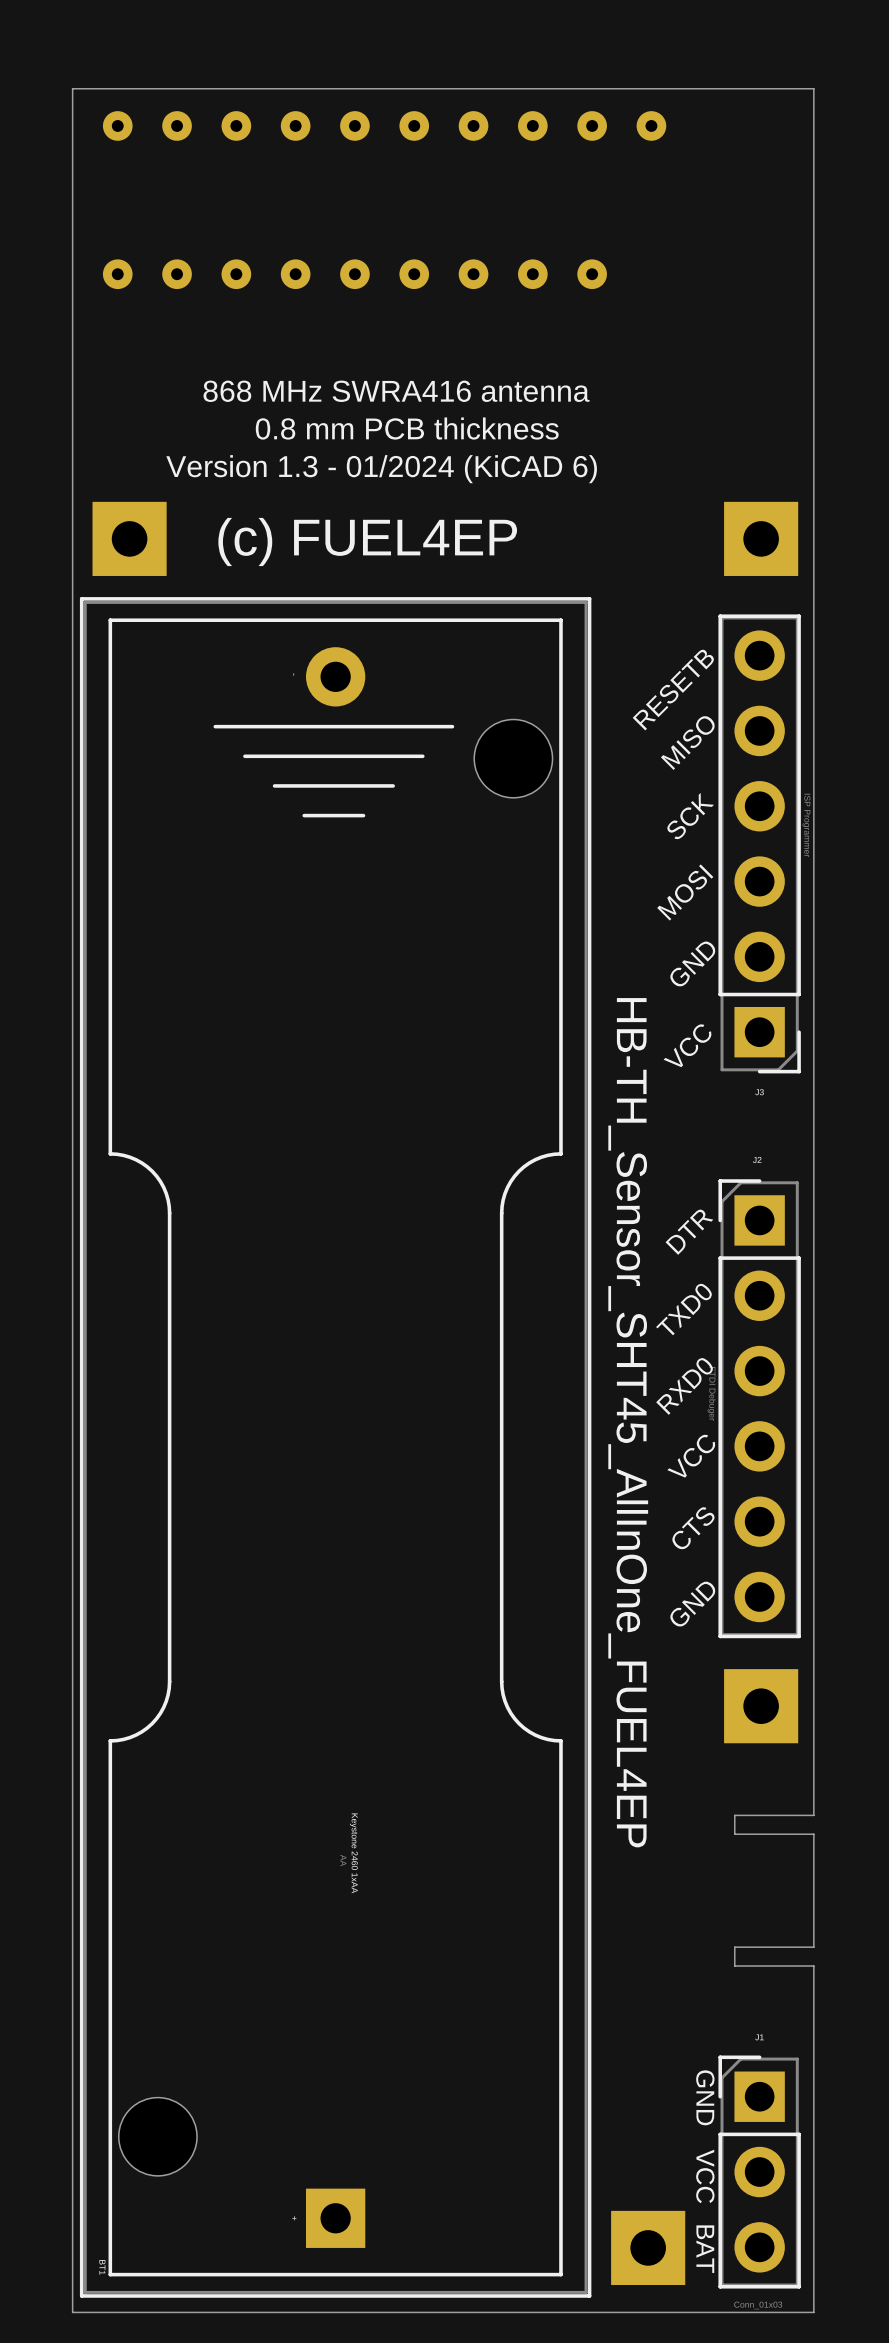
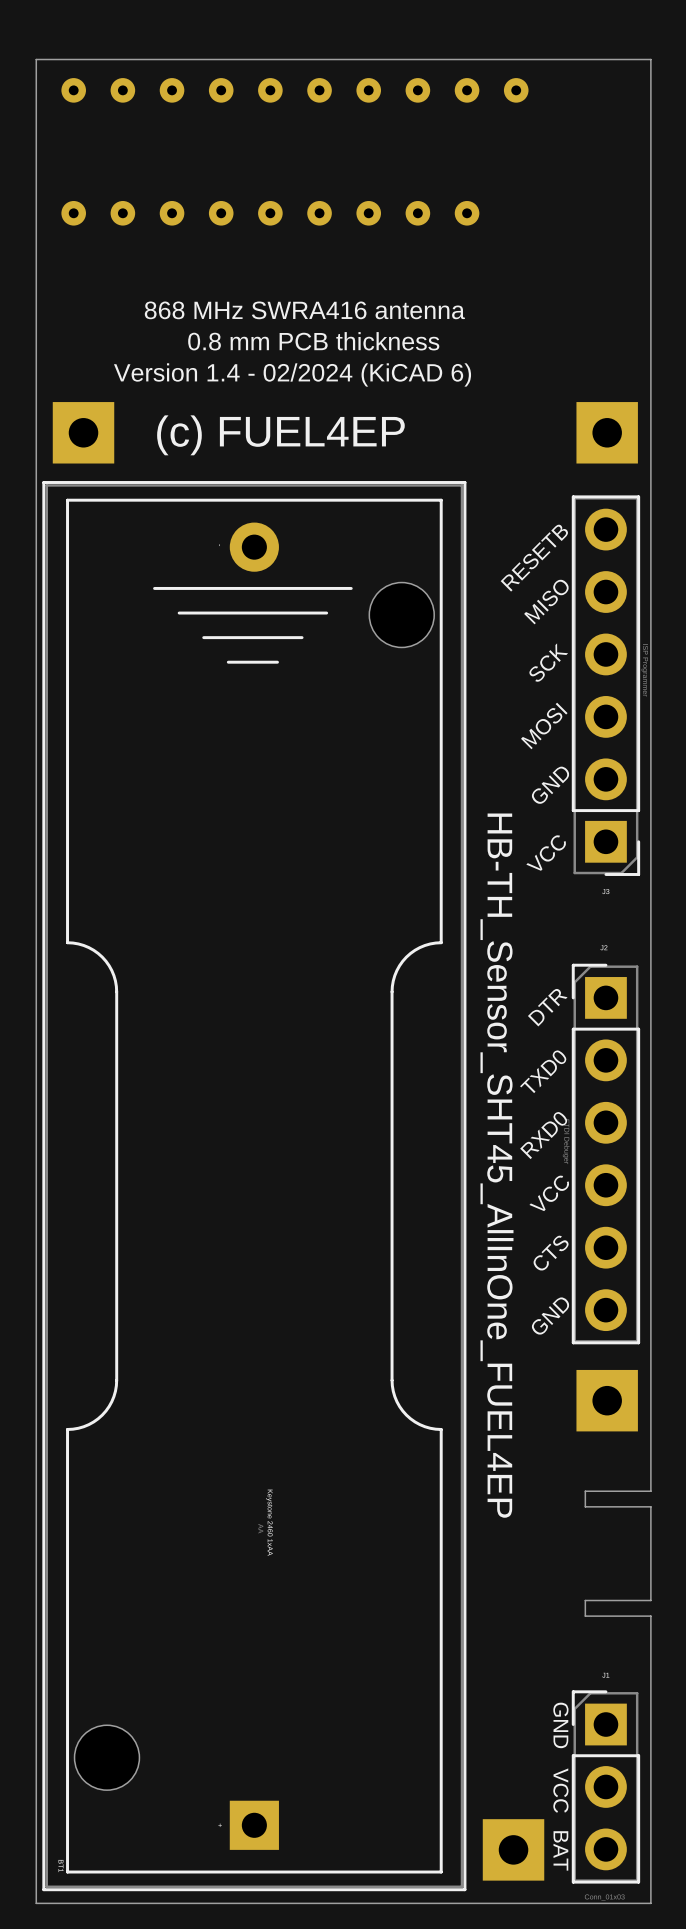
text: Version 1.3 - 01/2024 (KiCAD 6) (381, 469) -> Version 1.4 - 02/2024 (KiCAD 6) (292, 374)

